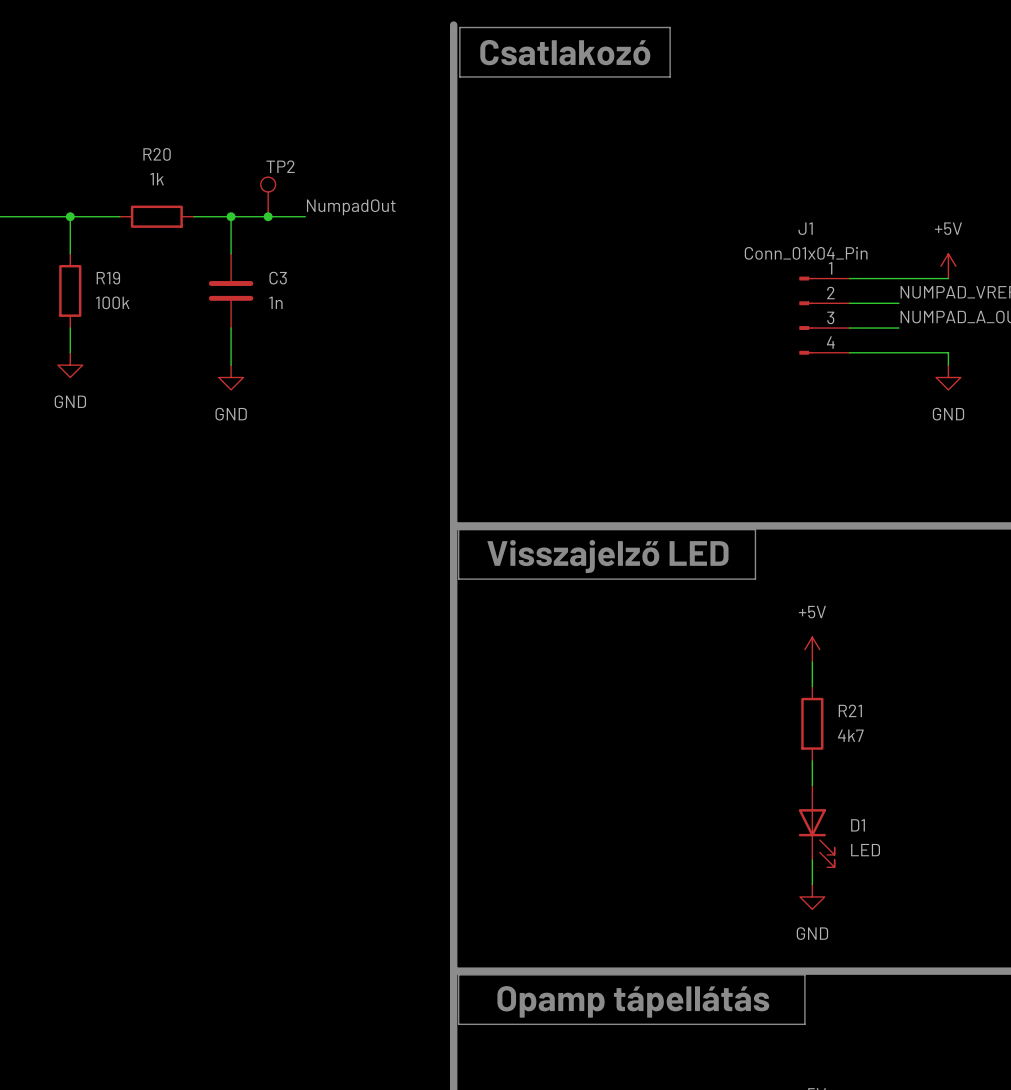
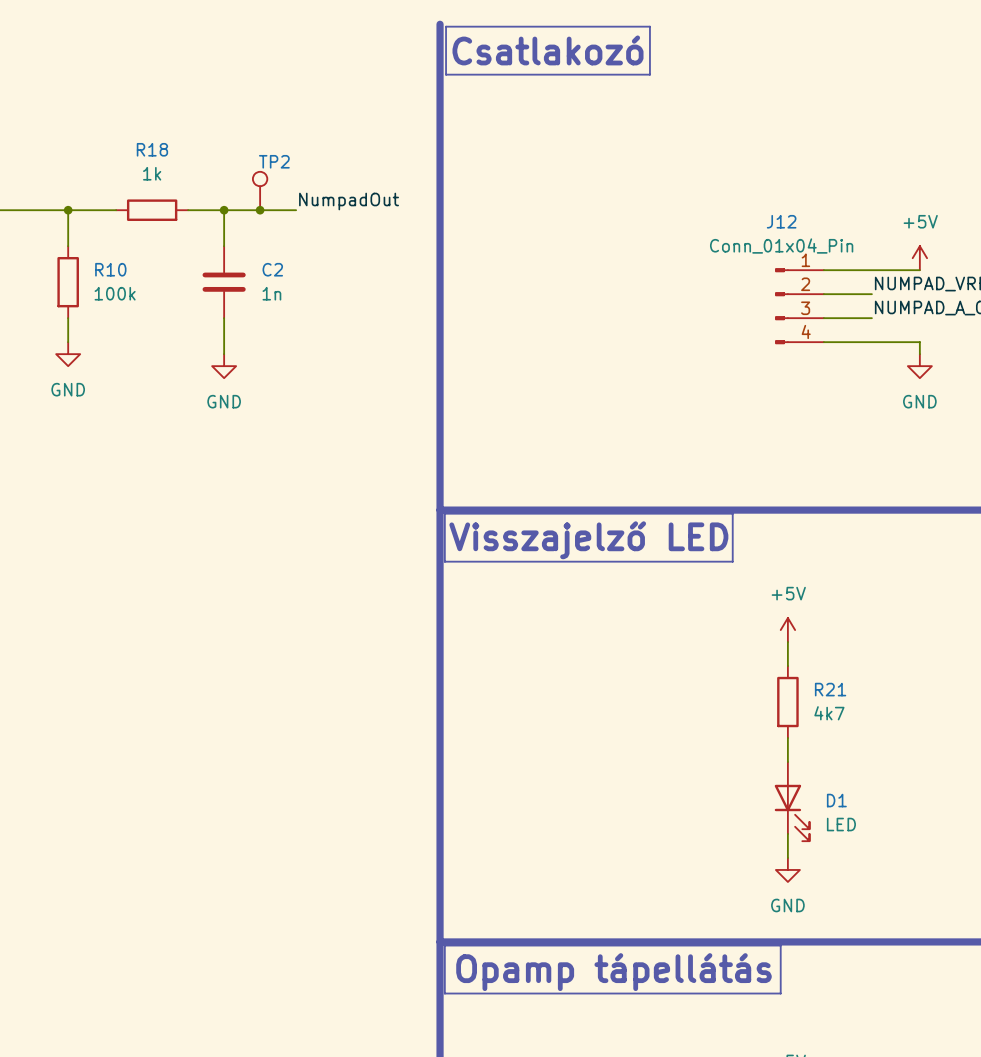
R20 name: R20 (157, 154) -> R18 (152, 149)
J1 name: J1 (805, 228) -> J12 (781, 221)
R19 name: R19 (108, 278) -> R10 (110, 269)
C3 name: C3 (278, 278) -> C2 (272, 269)

